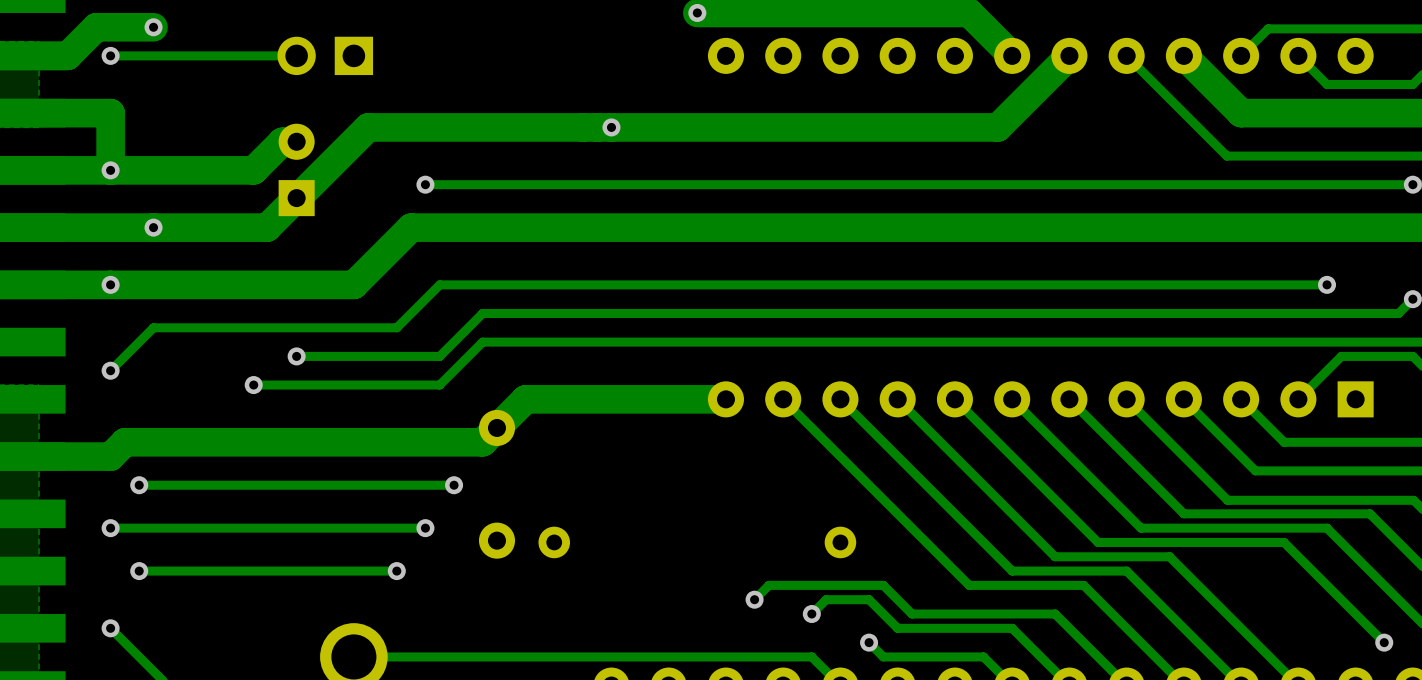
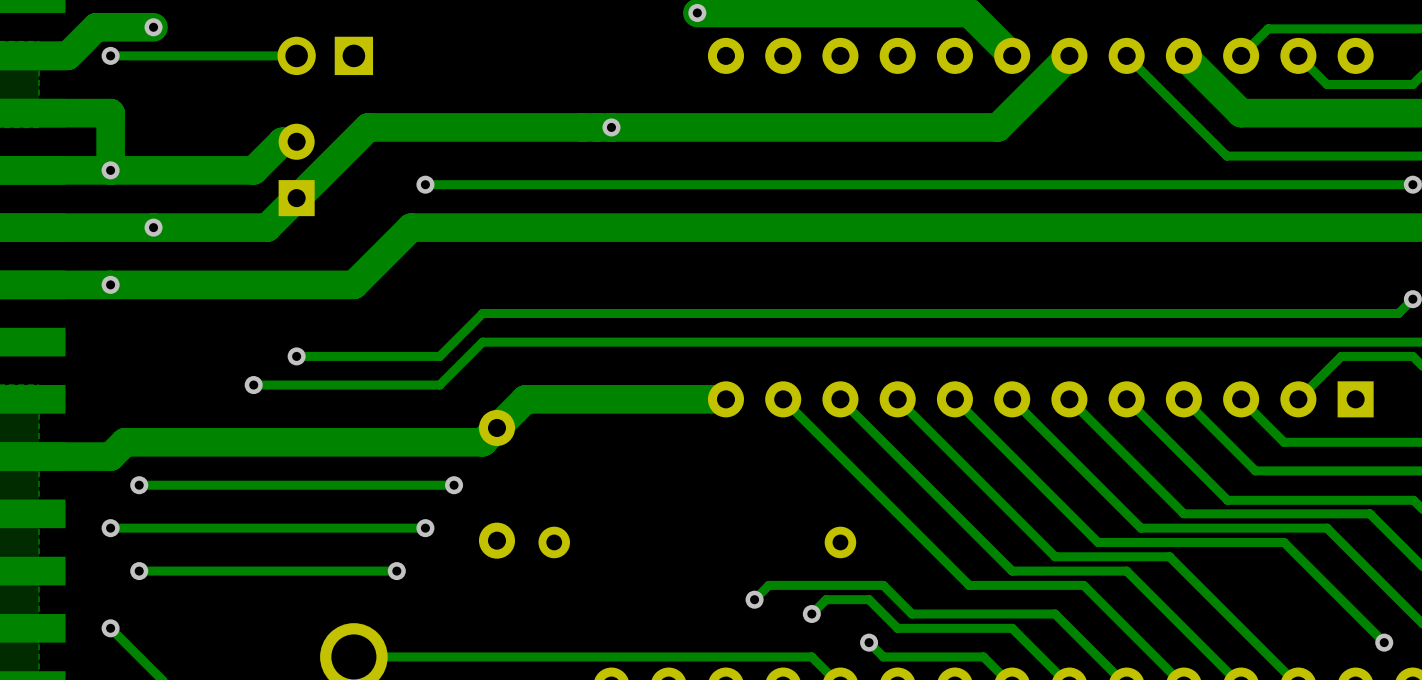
track: (1327, 284) (439, 284) (396, 327) (153, 327) (110, 370) -> none
via: (1327, 284) -> none
via: (110, 370) -> none

